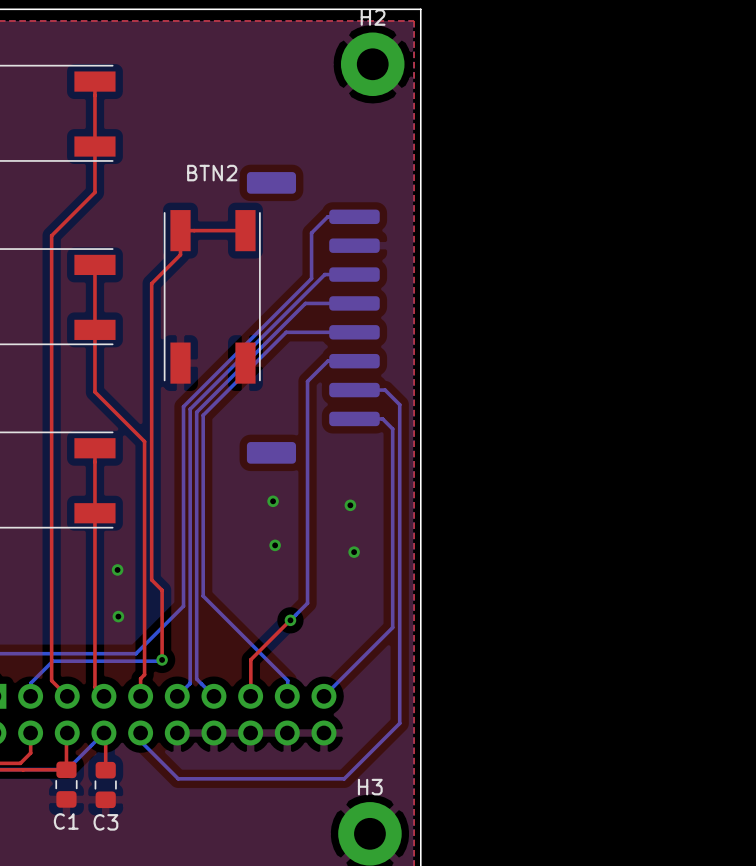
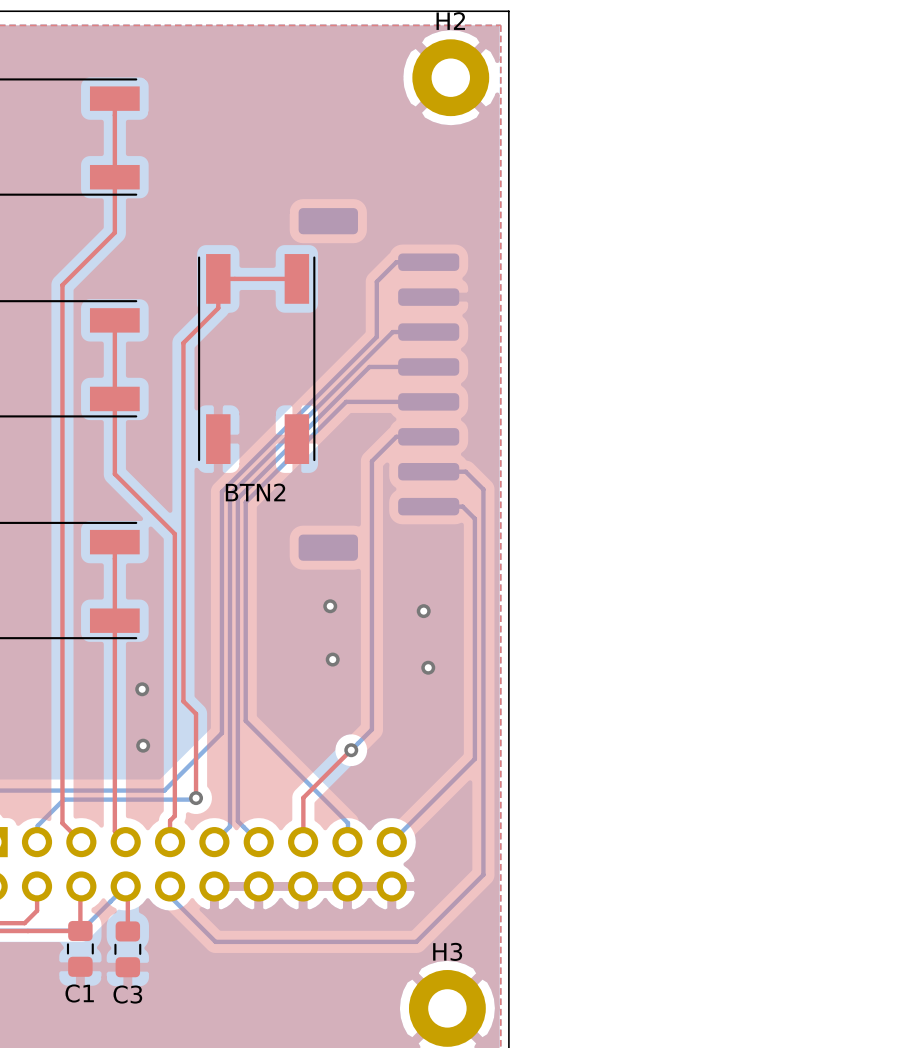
BTN2 name position: BTN2 (212, 173) -> BTN2 (255, 492)

